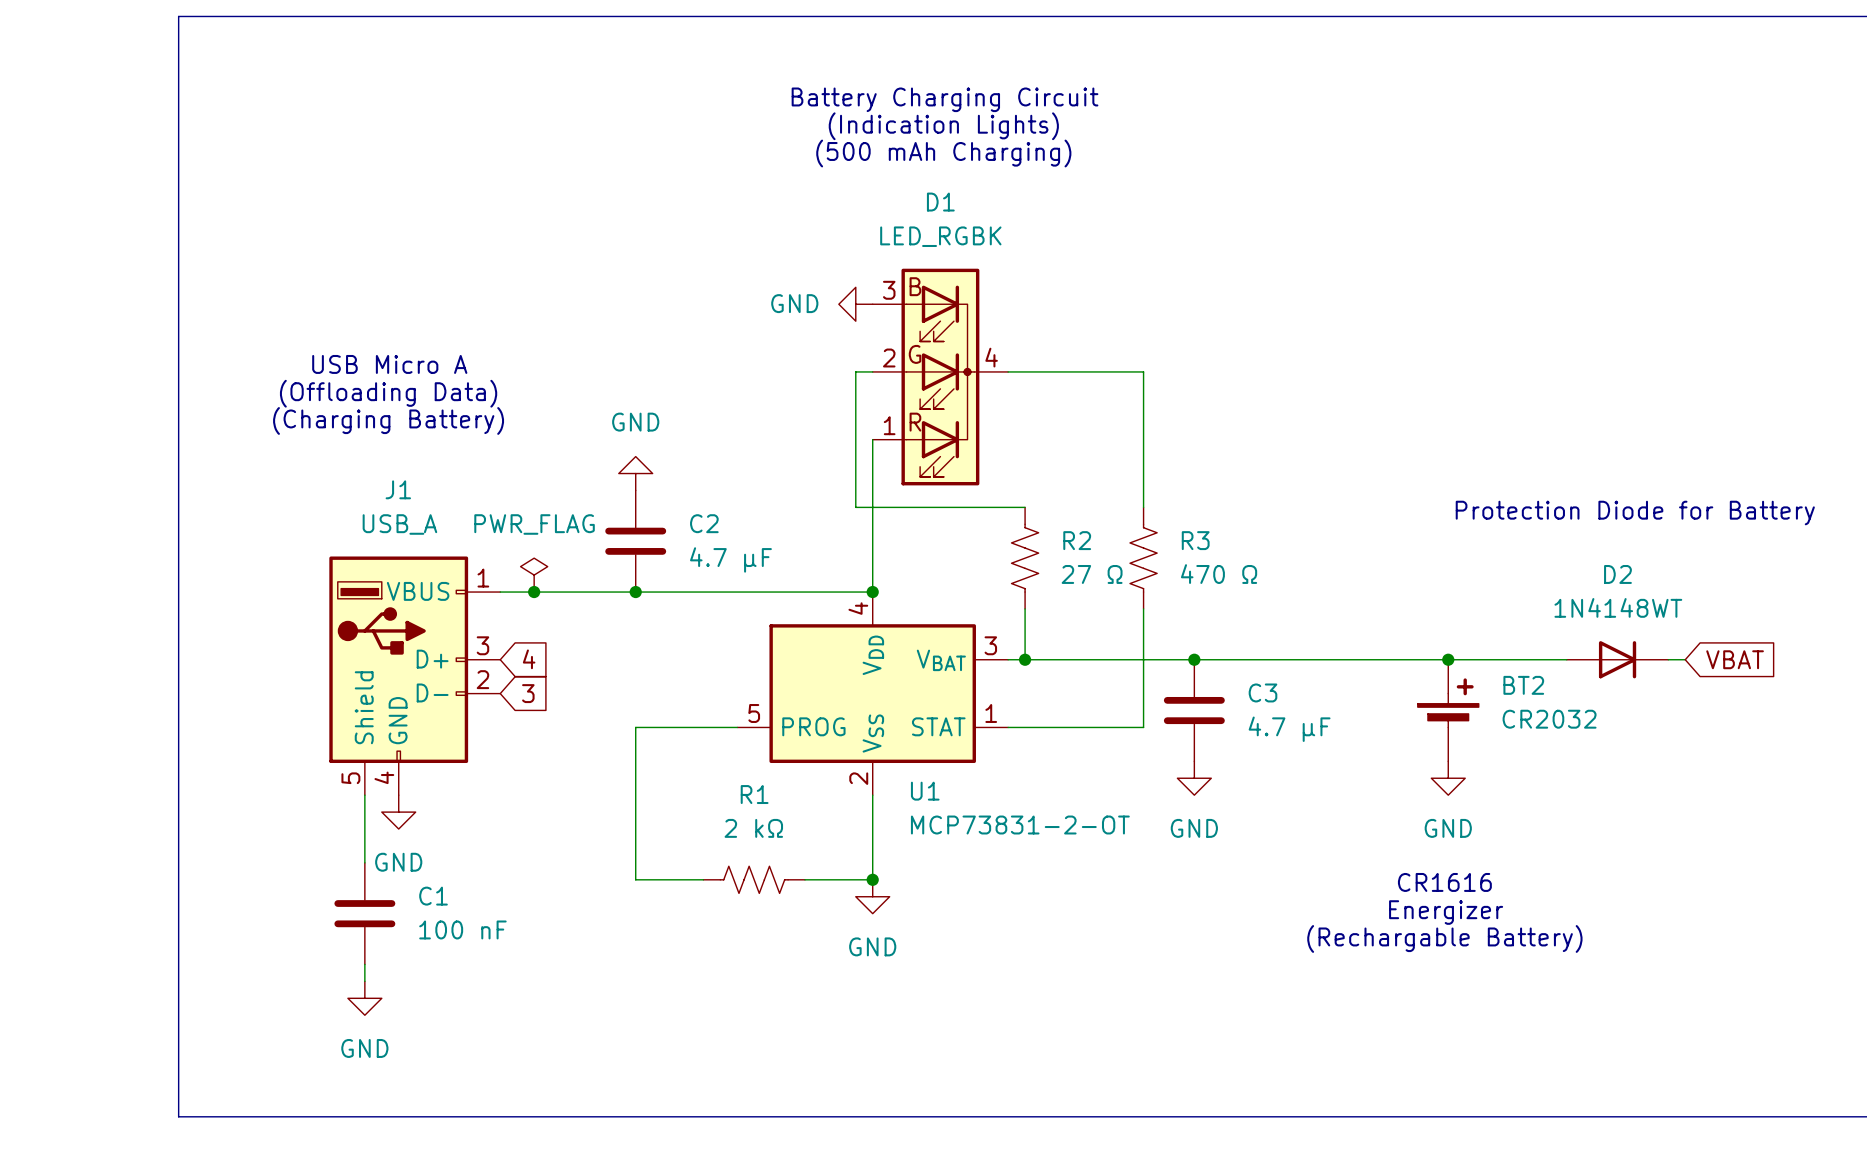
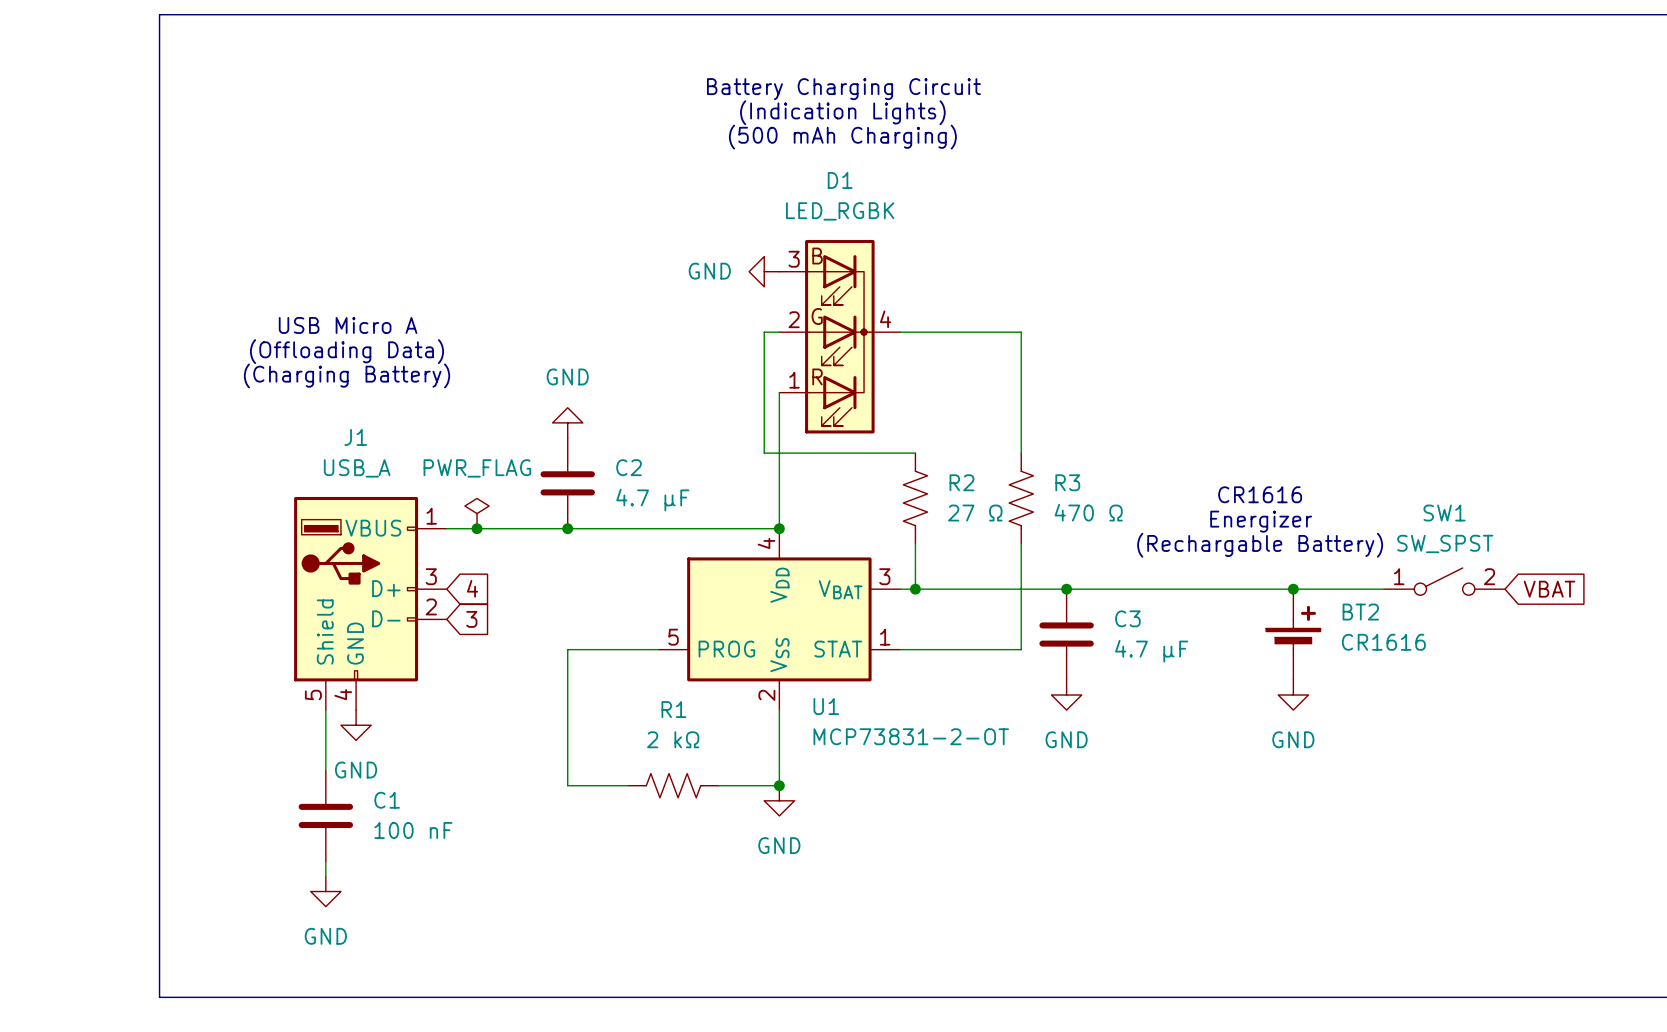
text: Protection Diode for Battery (1635, 513) -> none
SW1: none -> SW_SPST (1444, 581)
D2: 1N4148WT (1617, 659) -> none
BT2 value: CR2032 (1549, 719) -> CR1616 (1383, 642)
text position: CR1616 (1444, 882) -> CR1616 (1260, 494)
text position: Energizer (1446, 912) -> Energizer (1261, 521)
text position: (Rechargable Battery) (1444, 938) -> (Rechargable Battery) (1260, 545)

